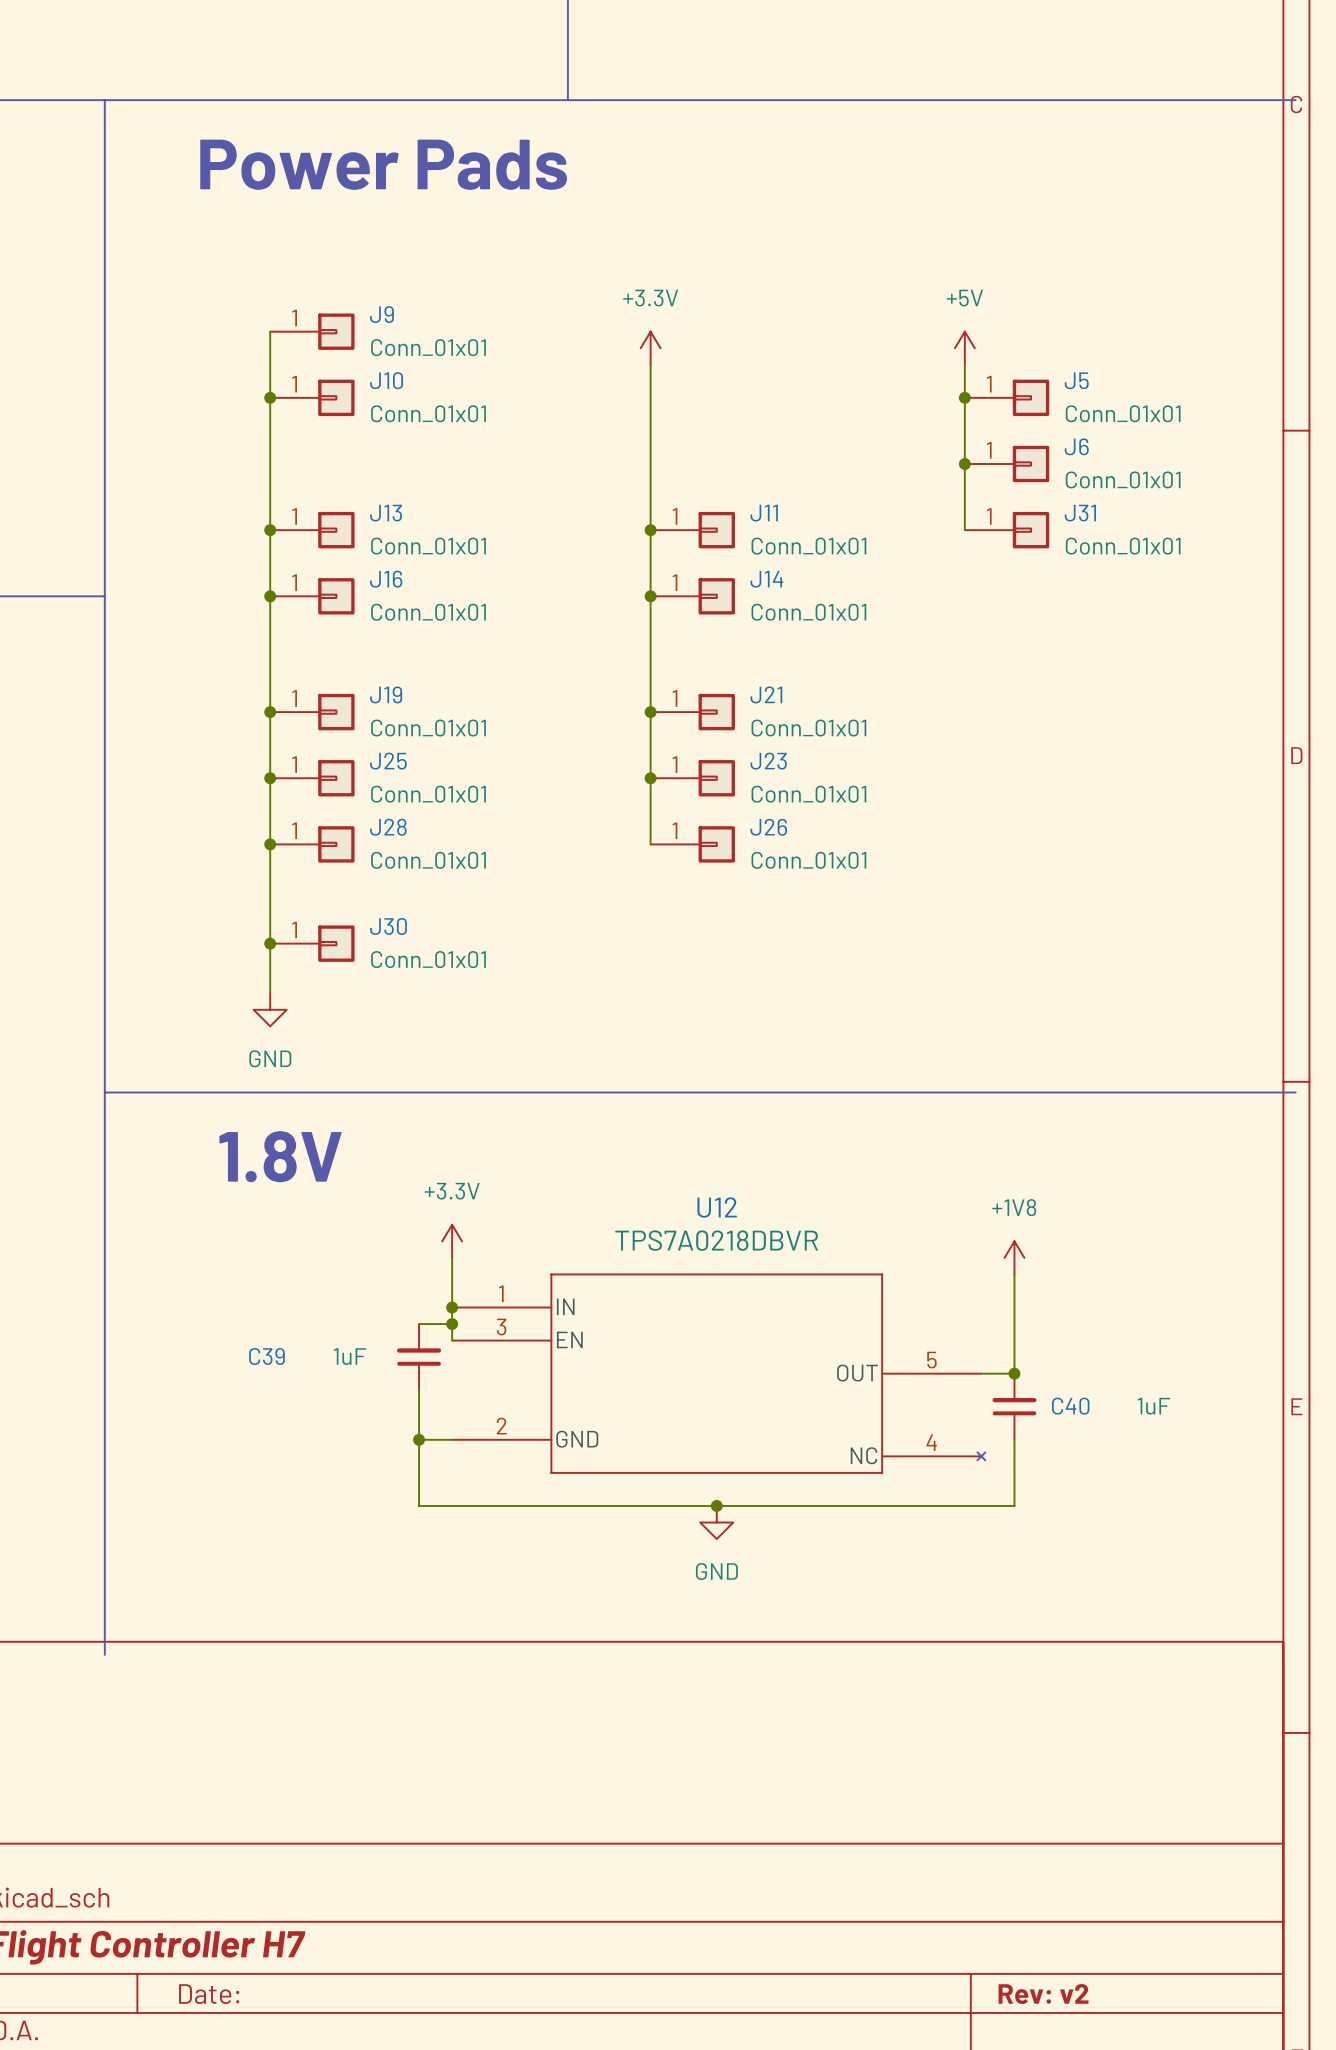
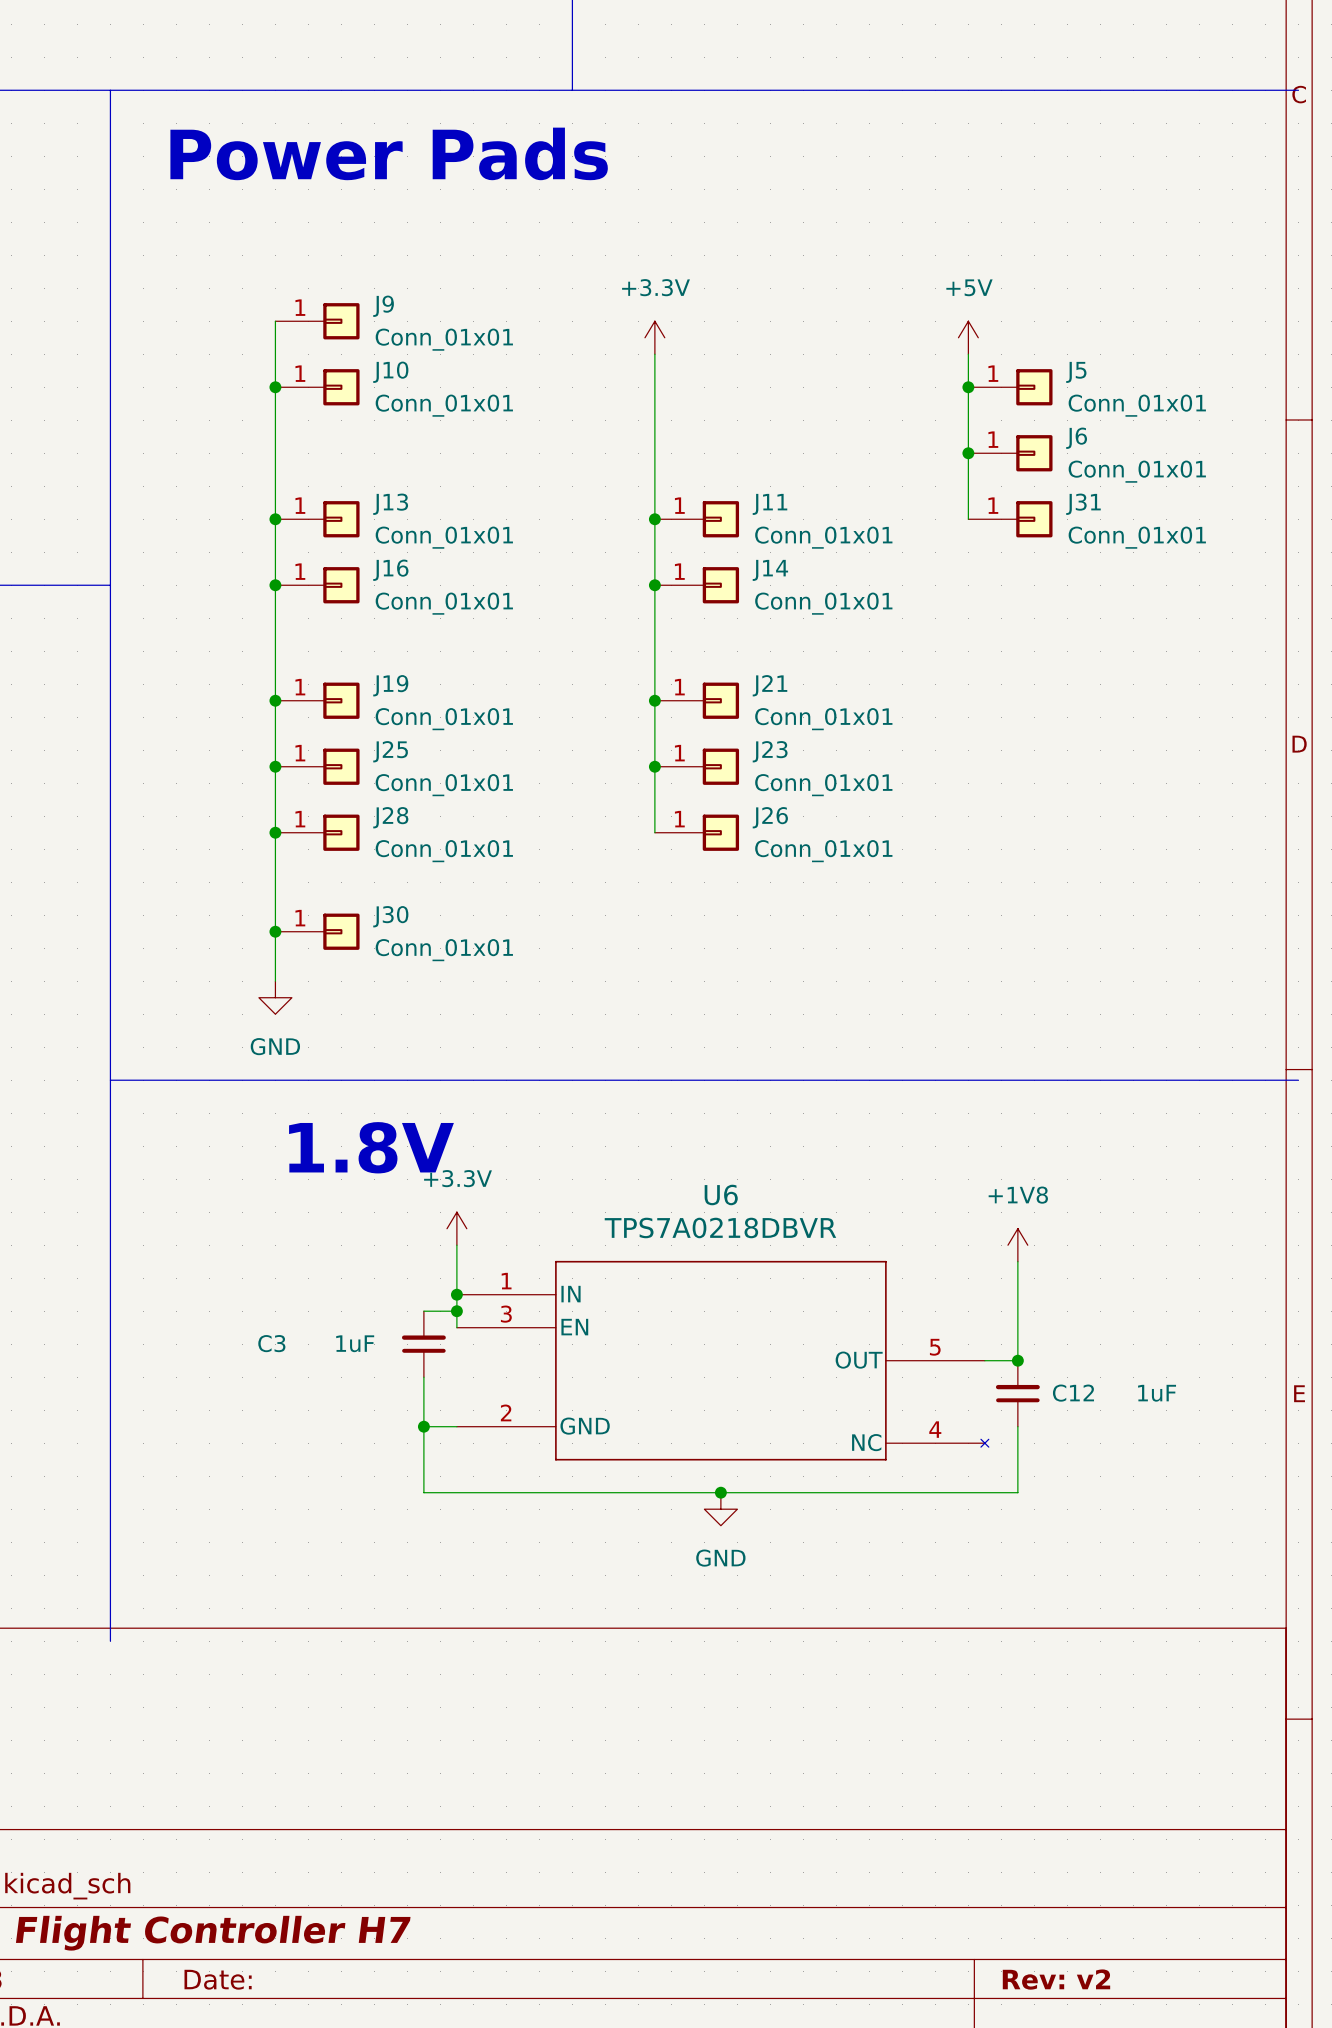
text position: 1.8V (280, 1156) -> 1.8V (371, 1147)
U12 name: U12 (717, 1207) -> U6 (721, 1194)
C39 name: C39 (266, 1356) -> C3 (271, 1343)
C40 name: C40 (1070, 1406) -> C12 (1073, 1393)

